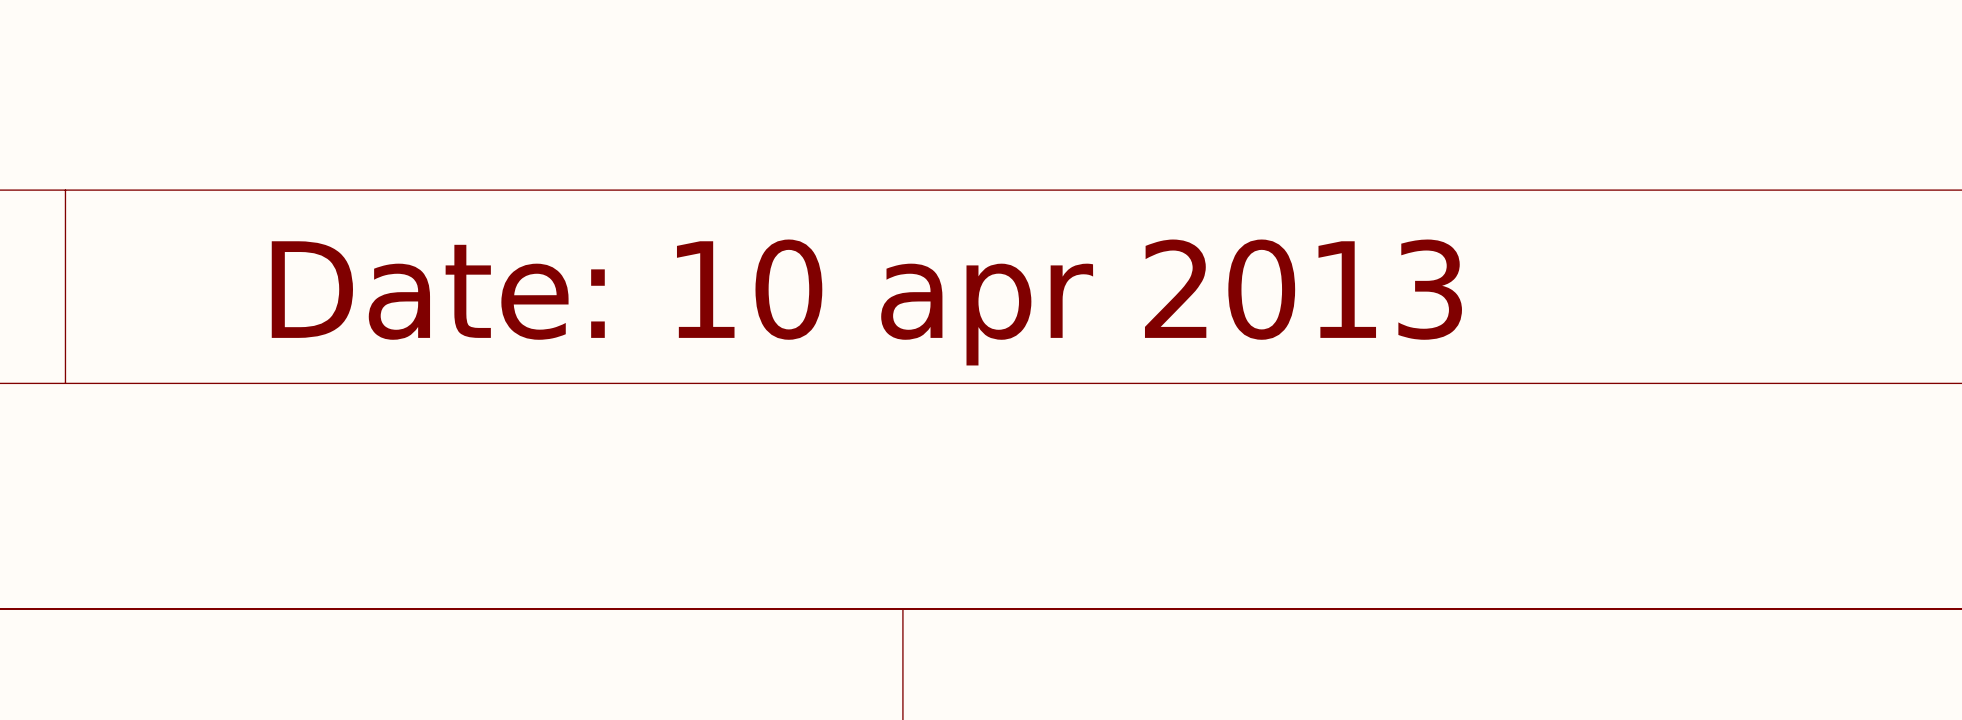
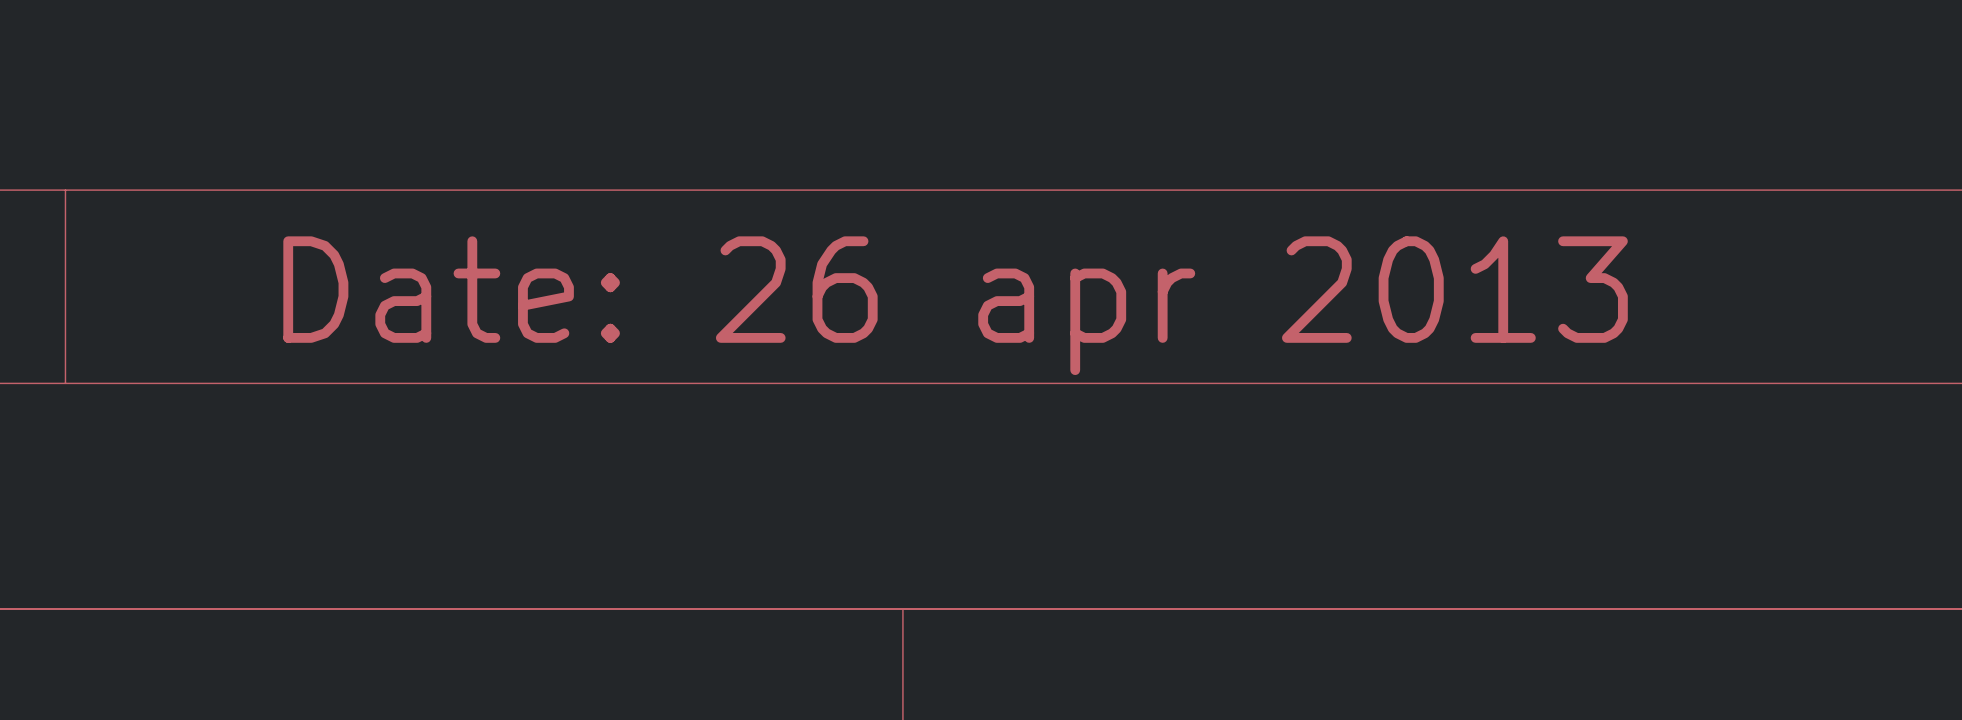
title block: Date: 10 apr 2013 (866, 302) -> Date: 26 apr 2013 (955, 305)

